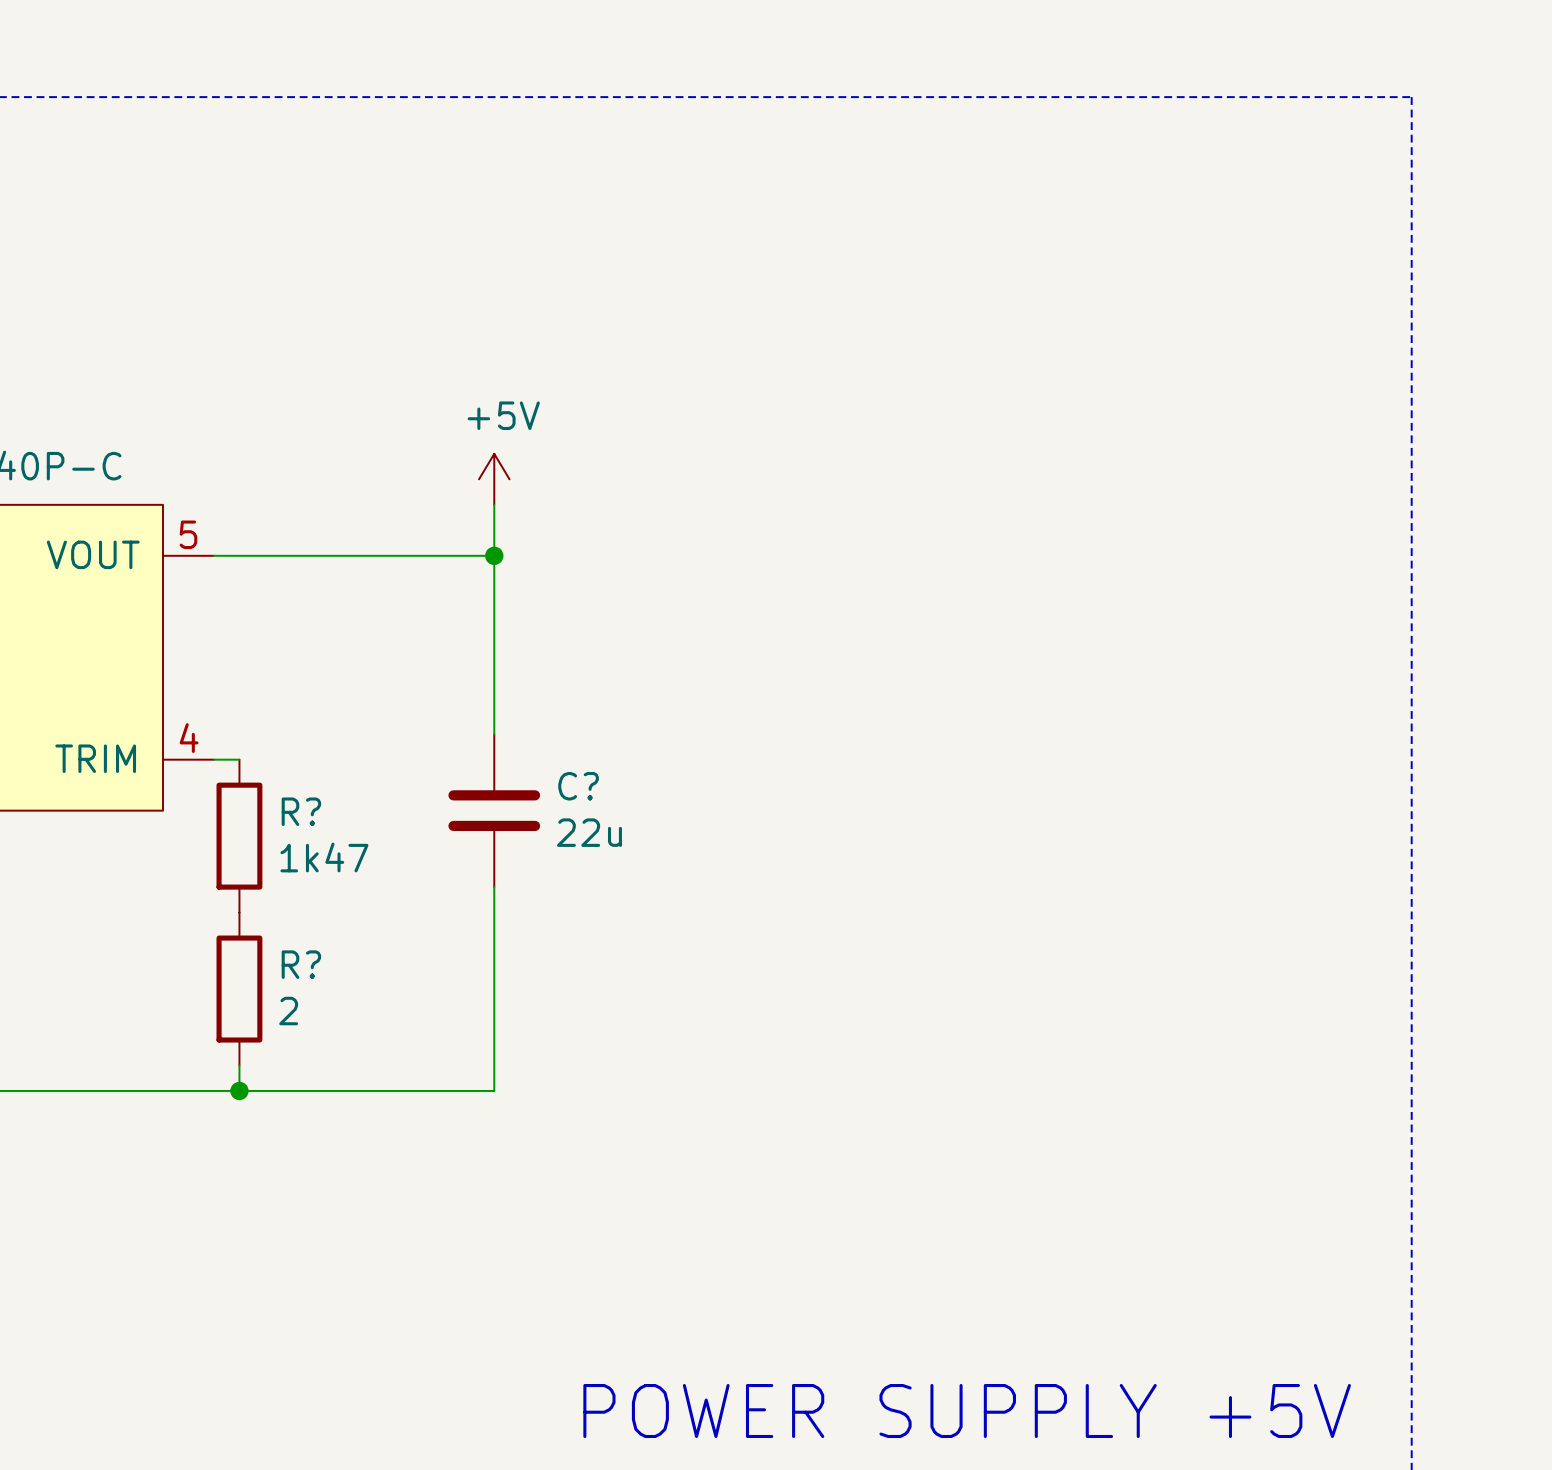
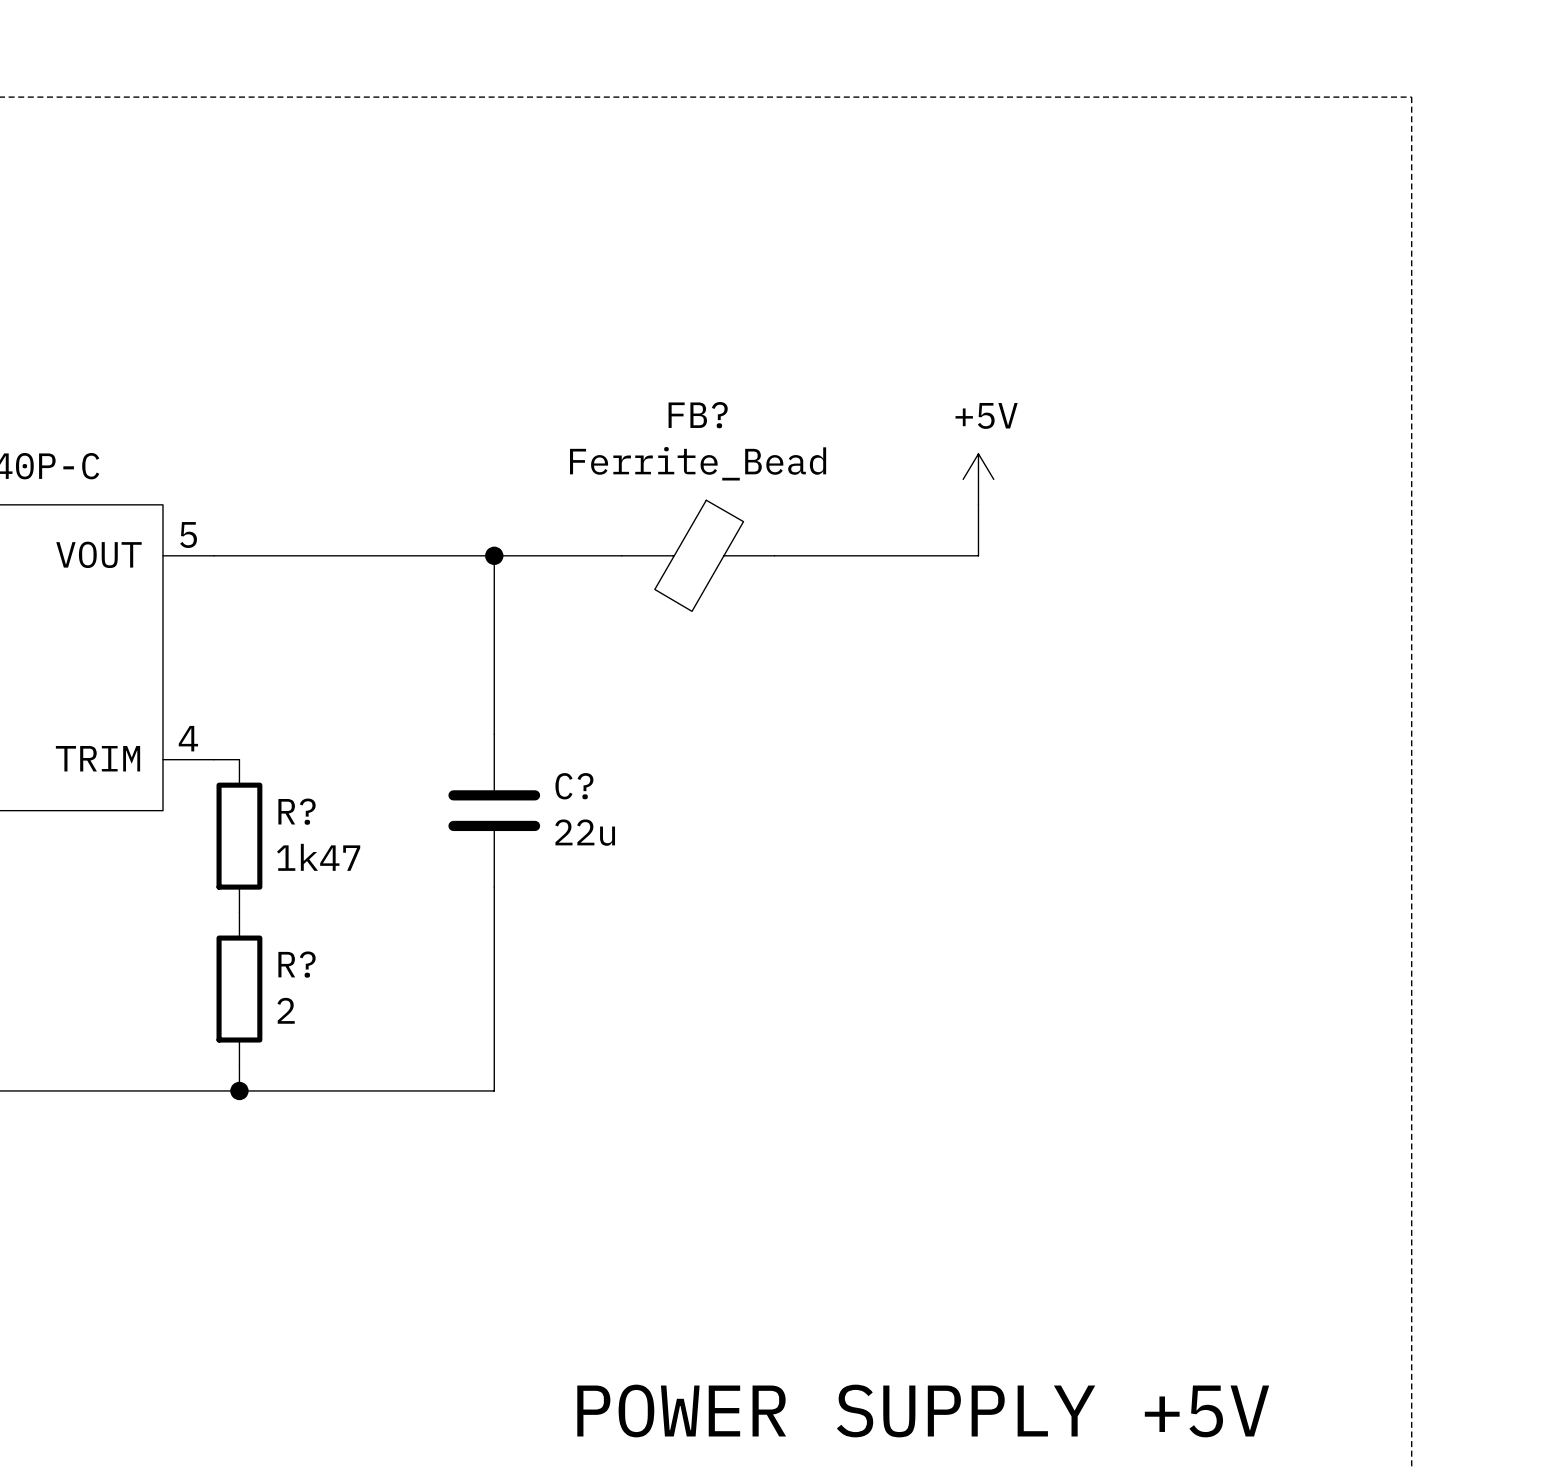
power symbol position: +5V (494, 479) -> +5V (978, 479)
wire: (494, 504) (494, 555) -> (621, 555) (494, 555)
wire: none -> (978, 504) (978, 555) (774, 555)
FB?: none -> Ferrite_Bead (698, 555)

